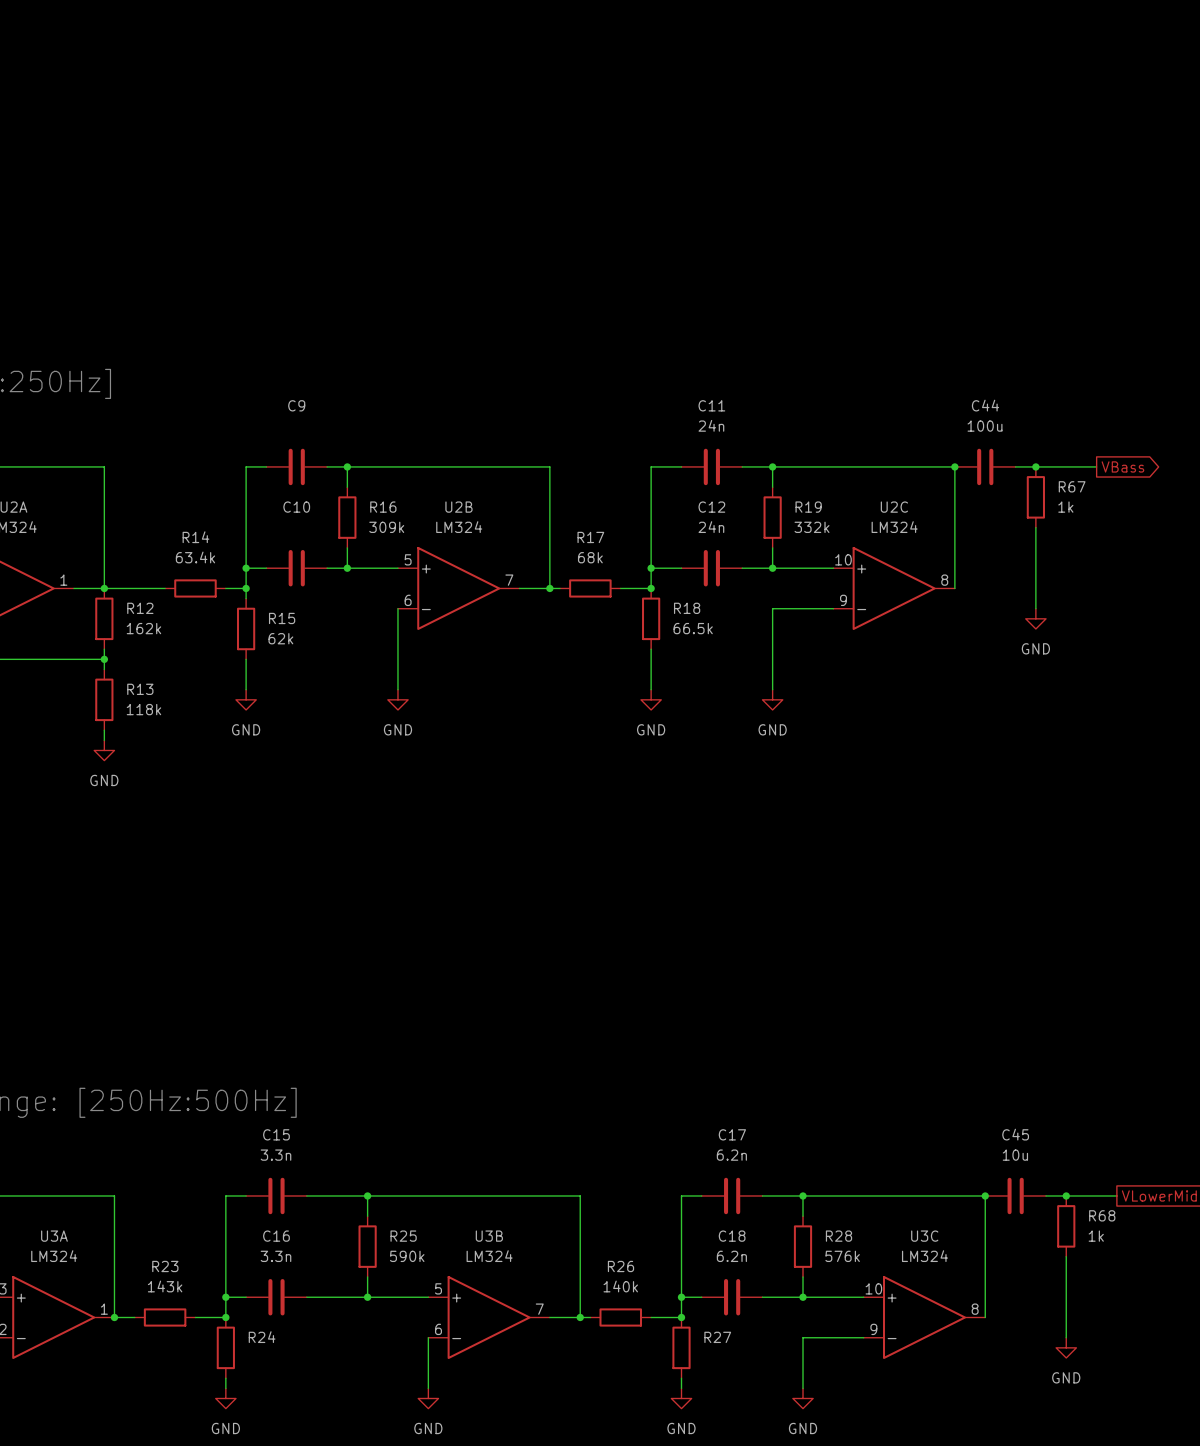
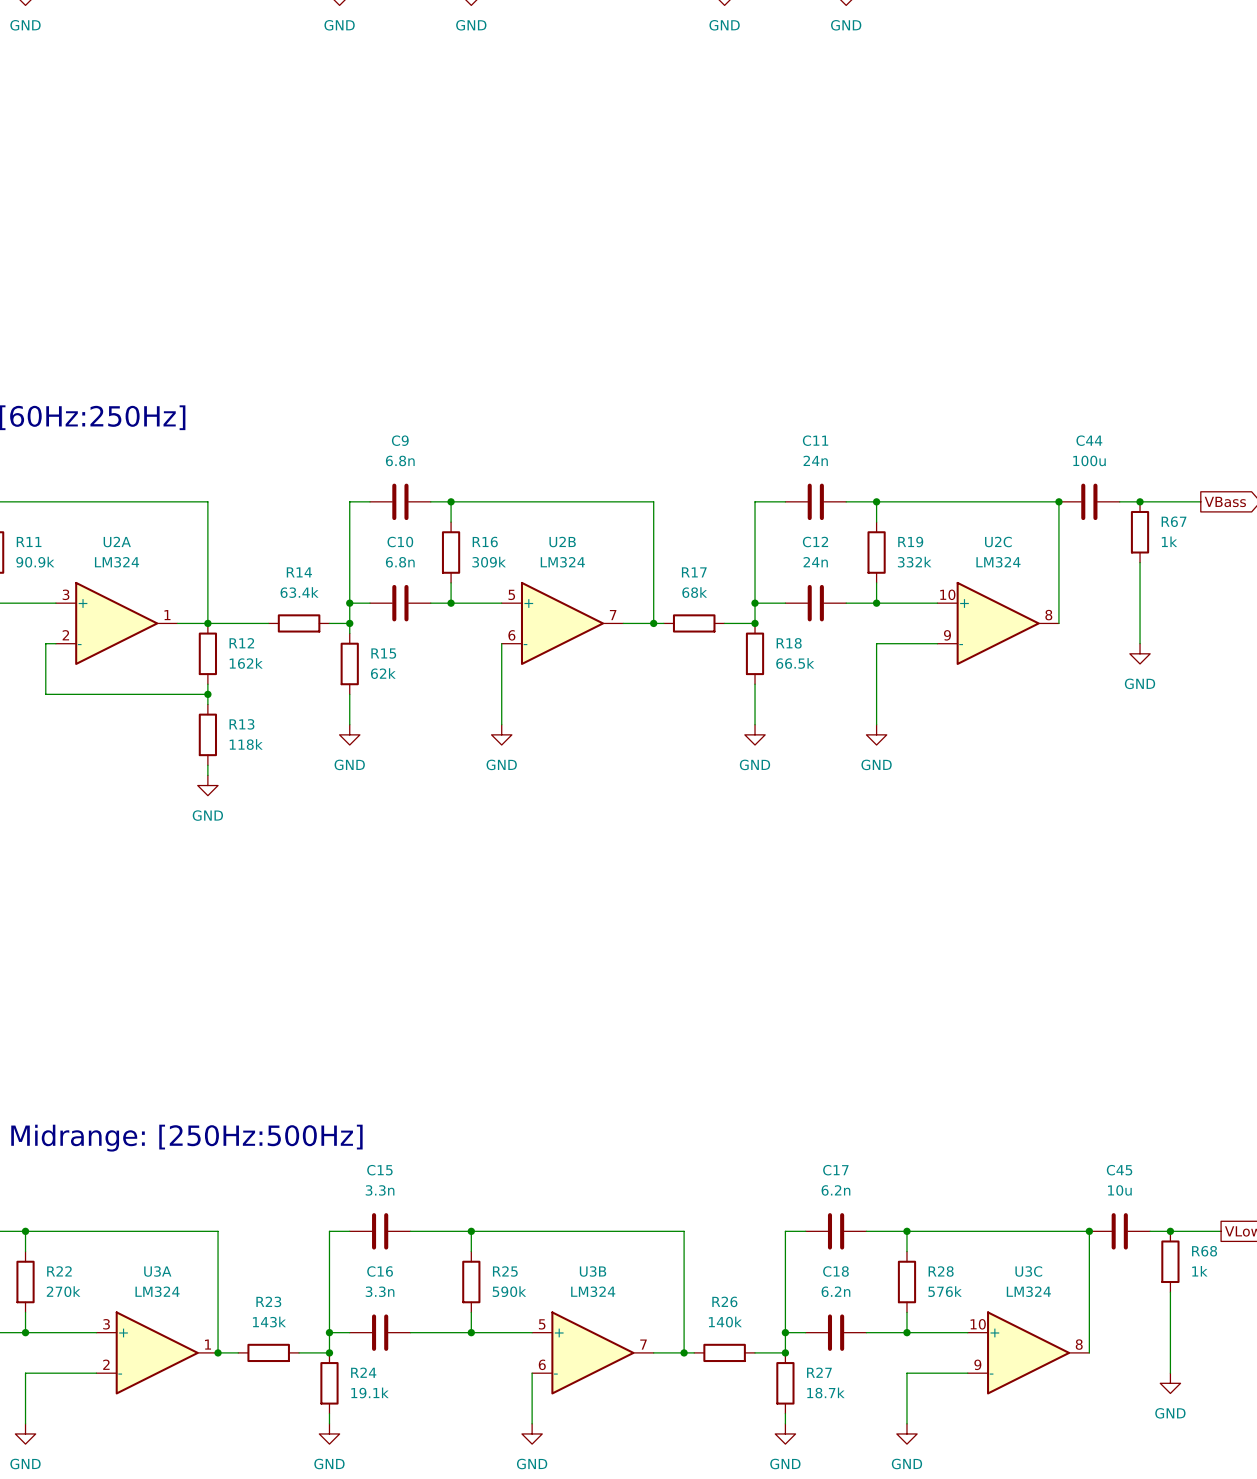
C9 value: none -> 6.8n (400, 460)
C10 value: none -> 6.8n (400, 562)
R24 value: none -> 19.1k (369, 1392)
R27 value: none -> 18.7k (825, 1392)

